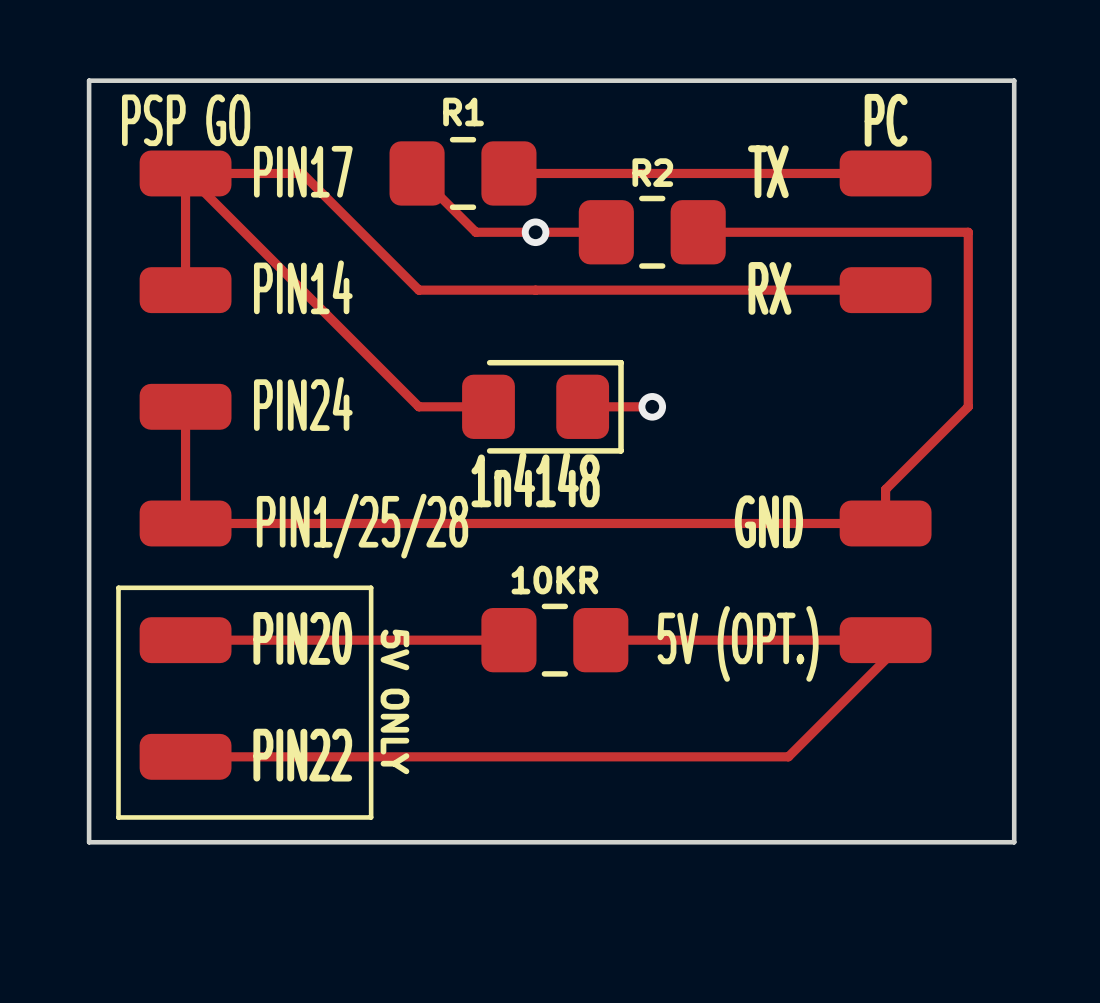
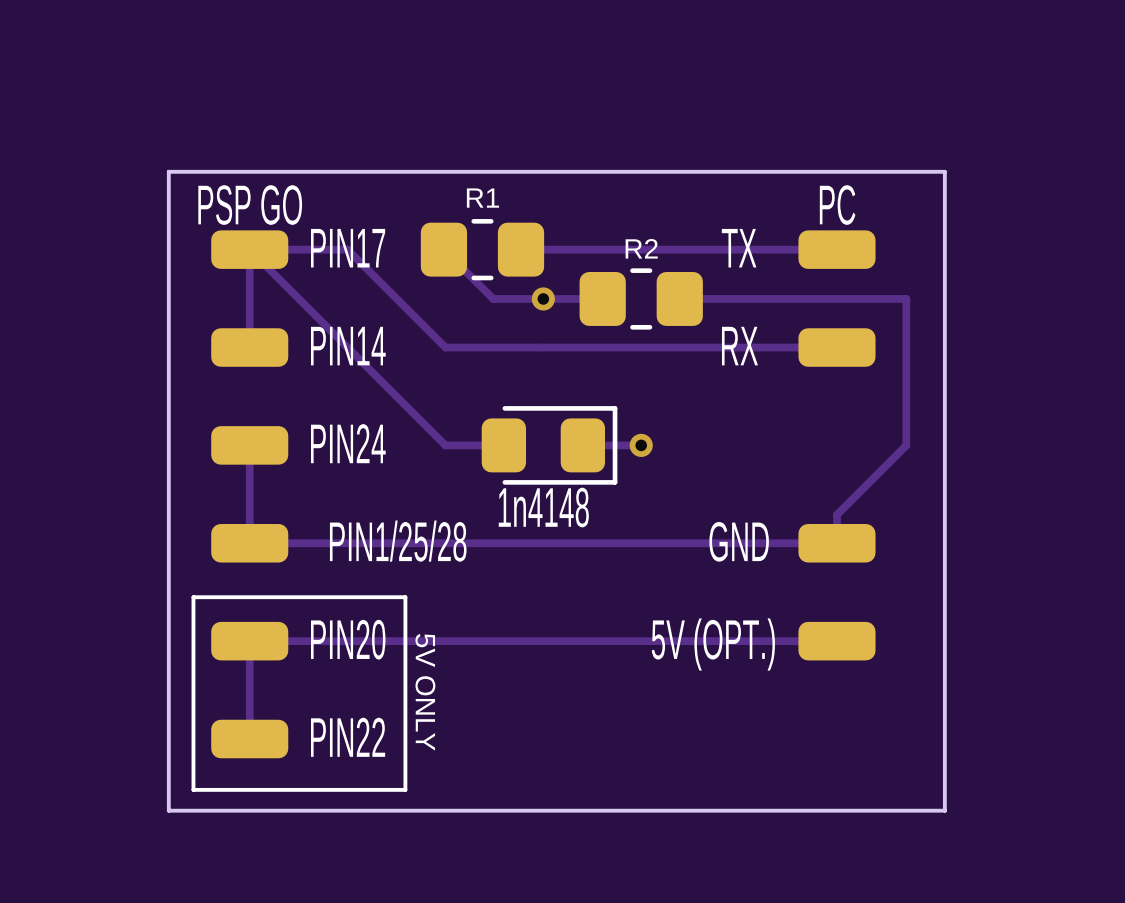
text: 10KR (554, 580) -> none
track: none -> (521, 641) (598, 641)
part: (554, 640) -> none
track: (895, 649) (788, 756) (185, 756) -> (249, 641) (249, 739)

